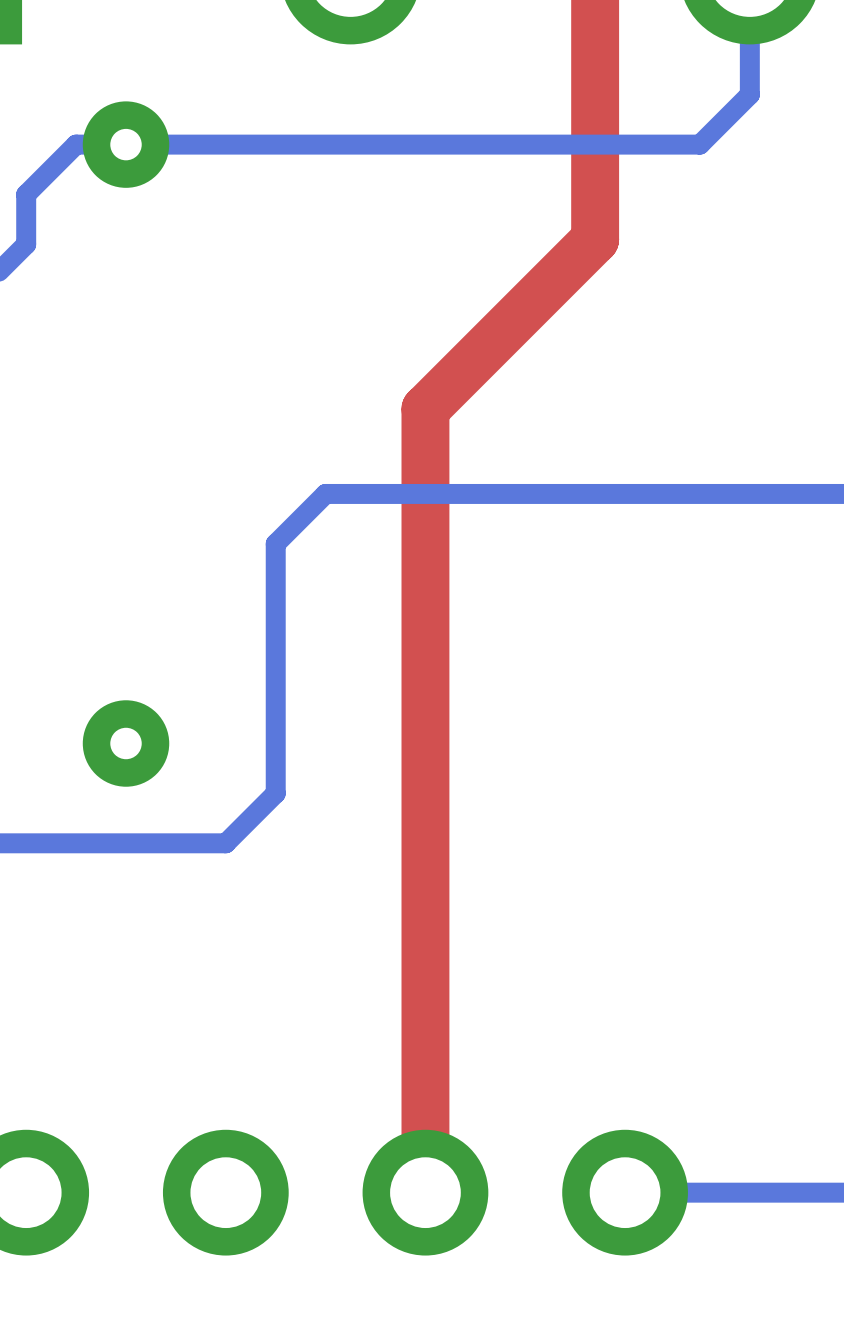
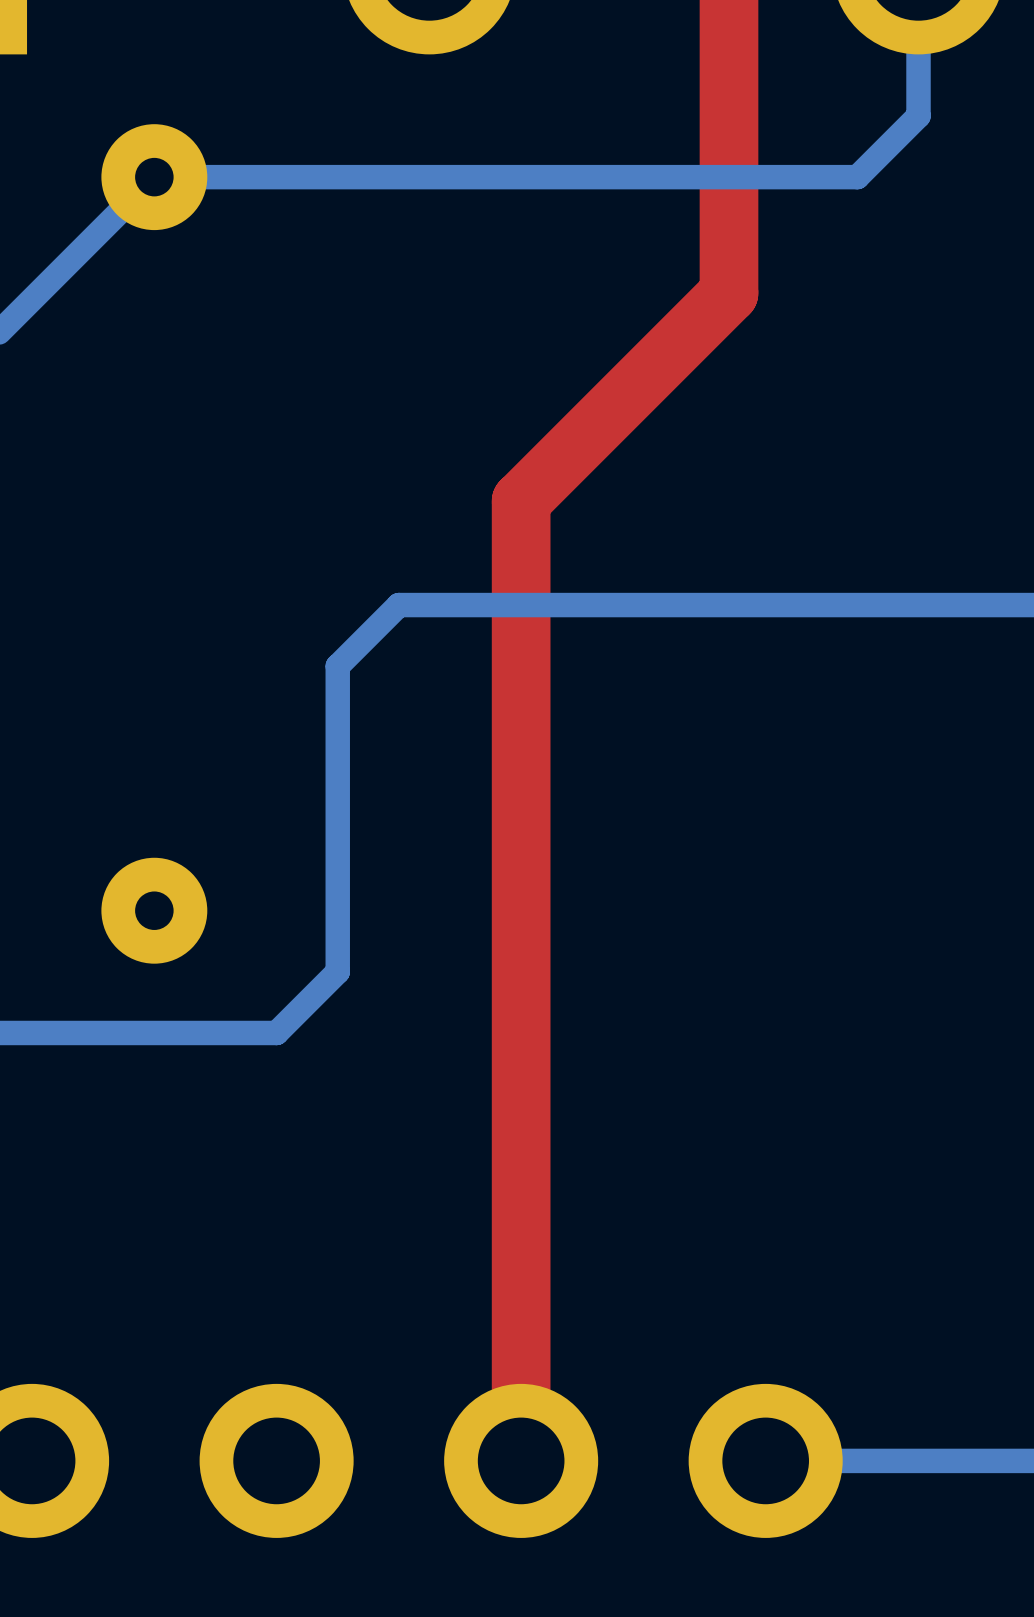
bottom track: (126, 144) (76, 144) (26, 194) (26, 244) -> (154, 177) (32, 299)

